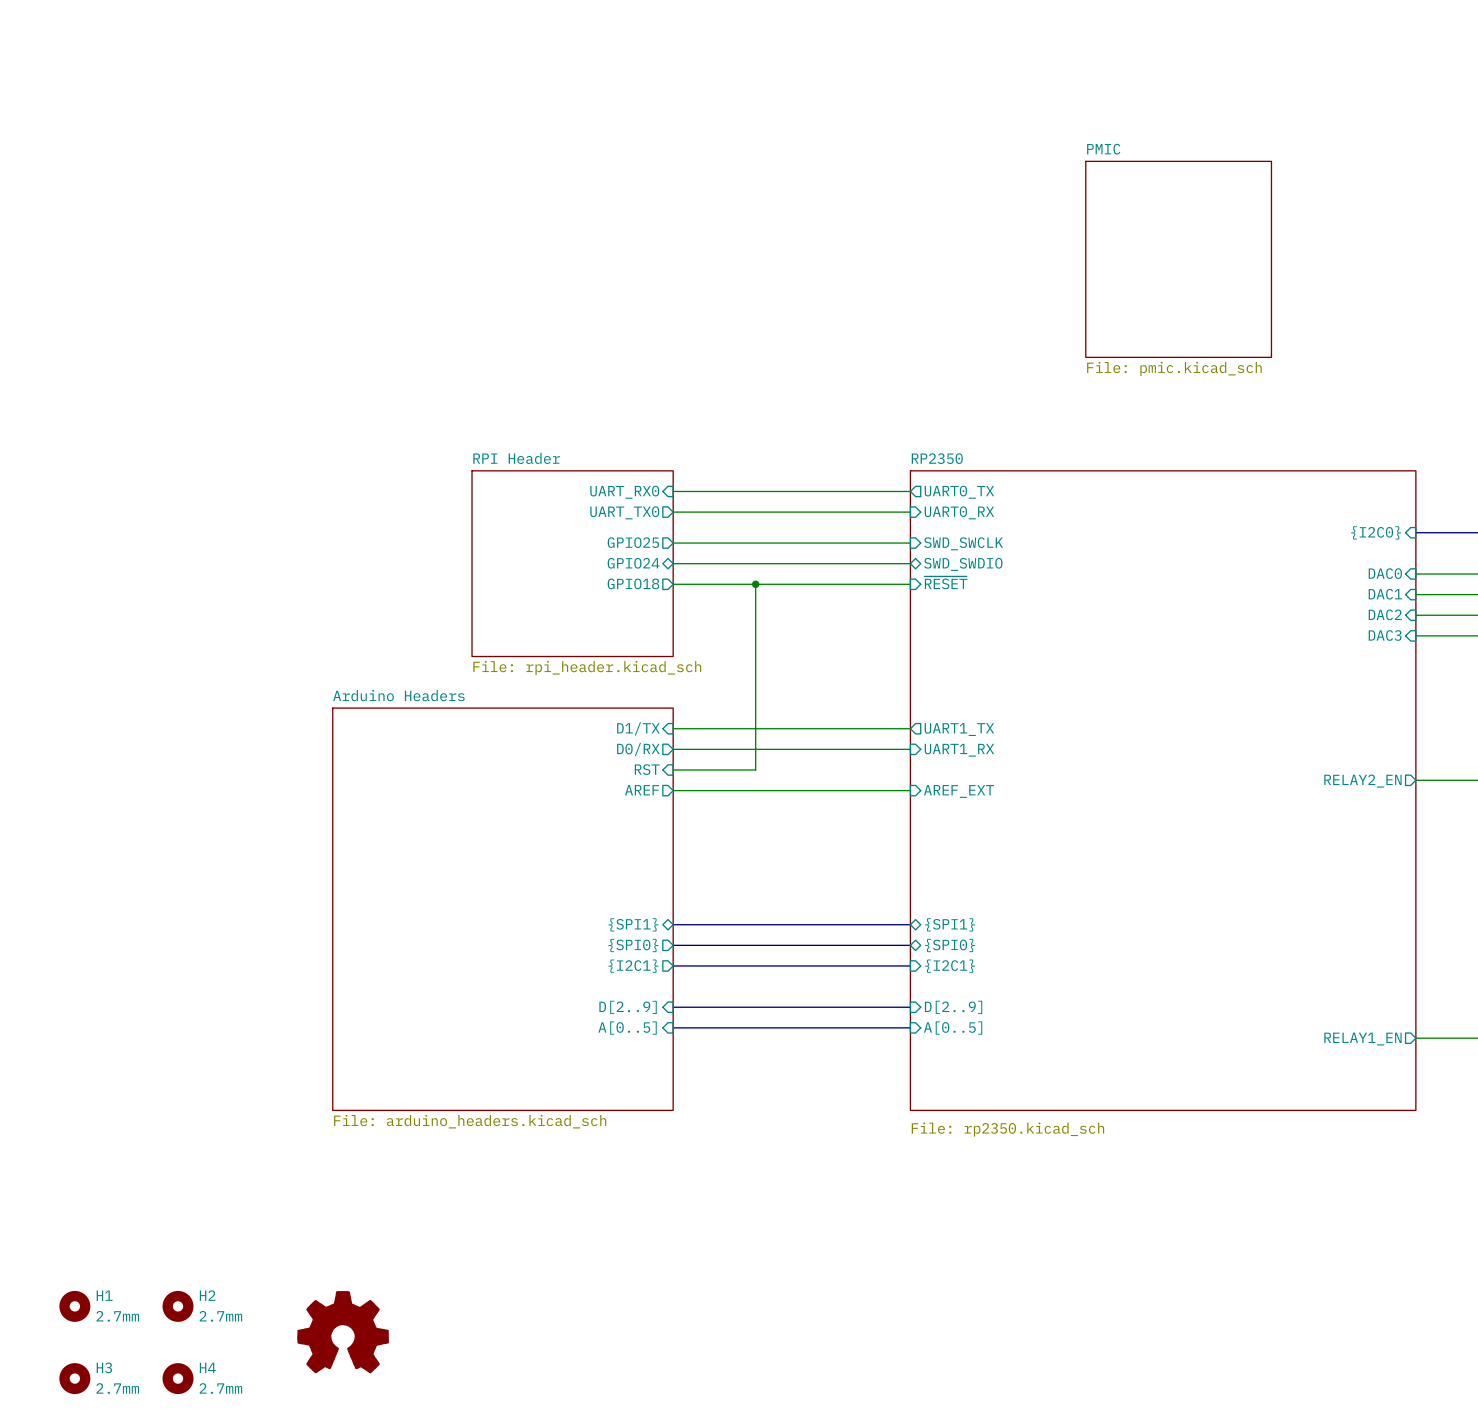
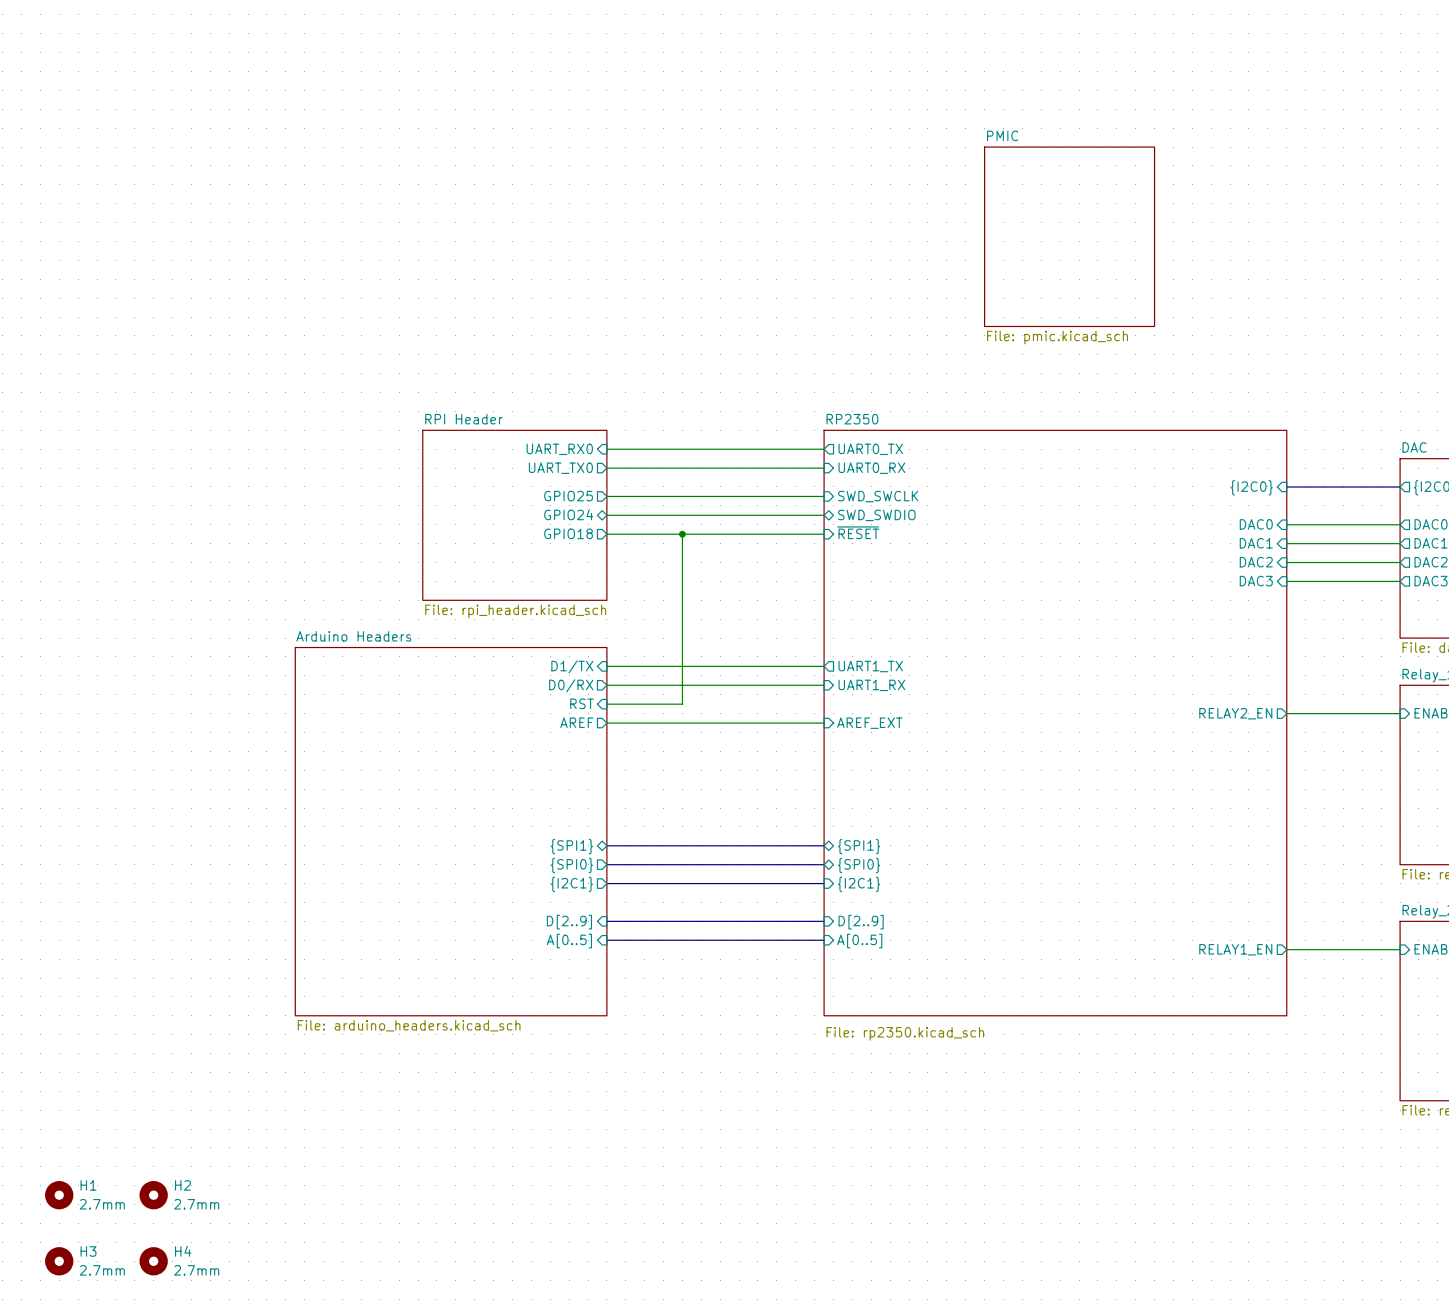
power symbol: (343, 1332) -> none

